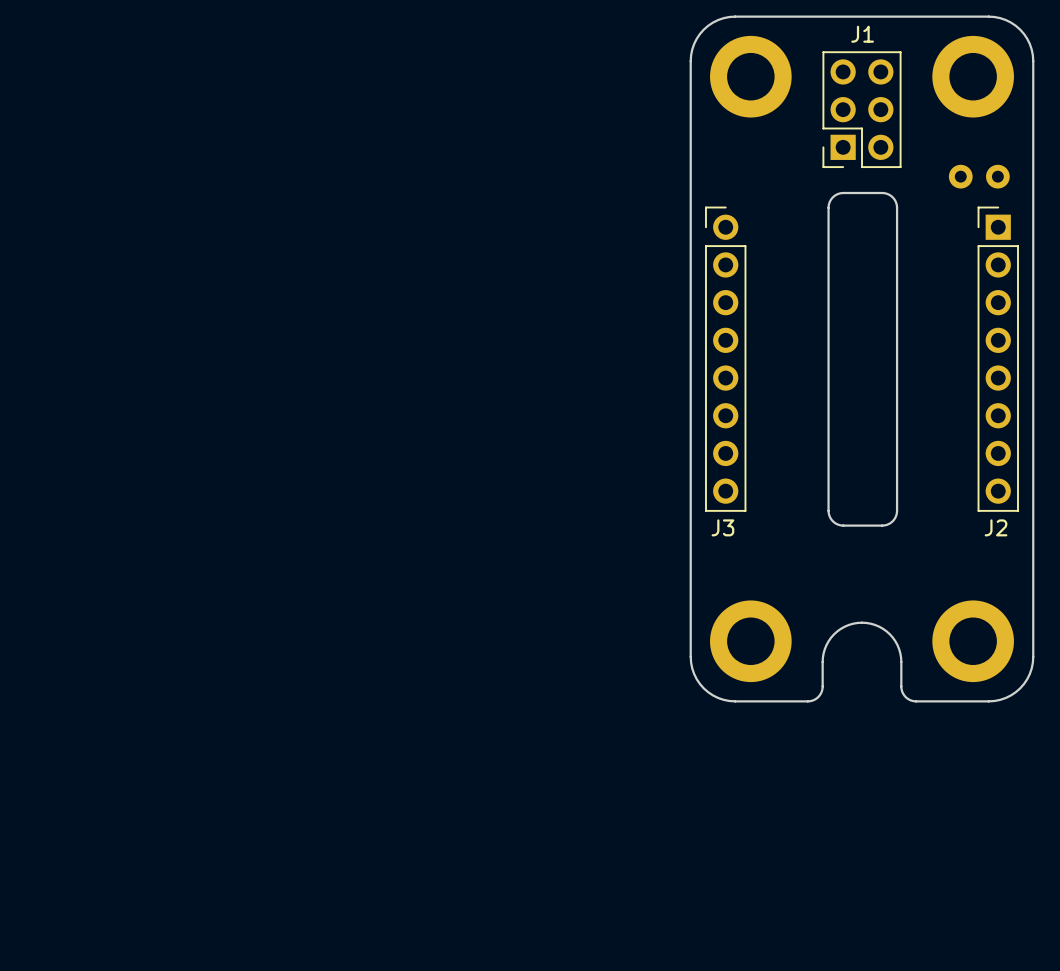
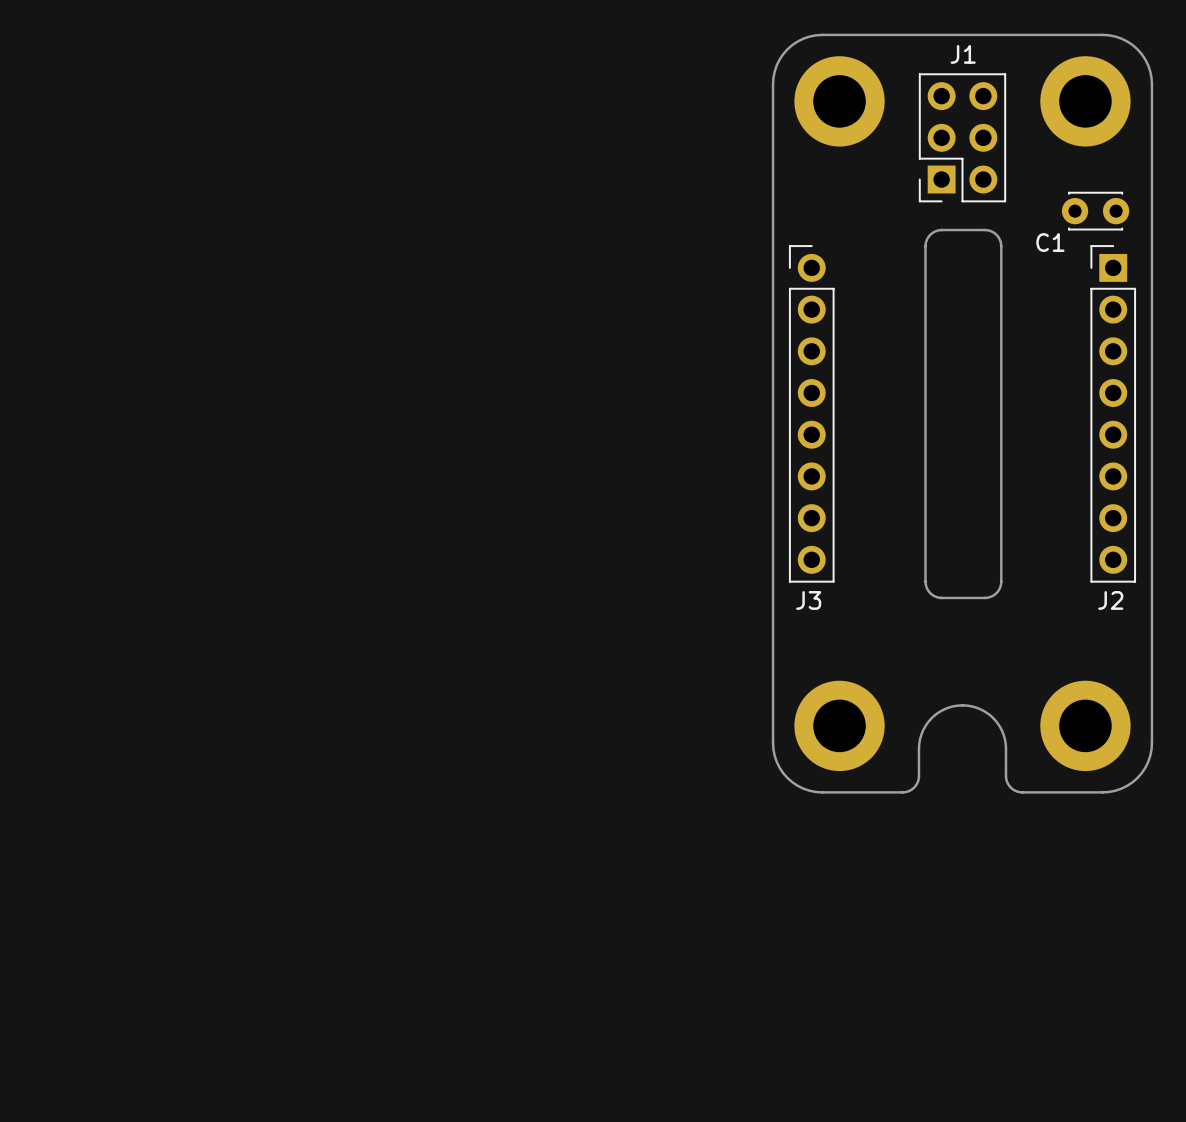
C1 side: top (979, 176) -> bottom (1095, 211)

